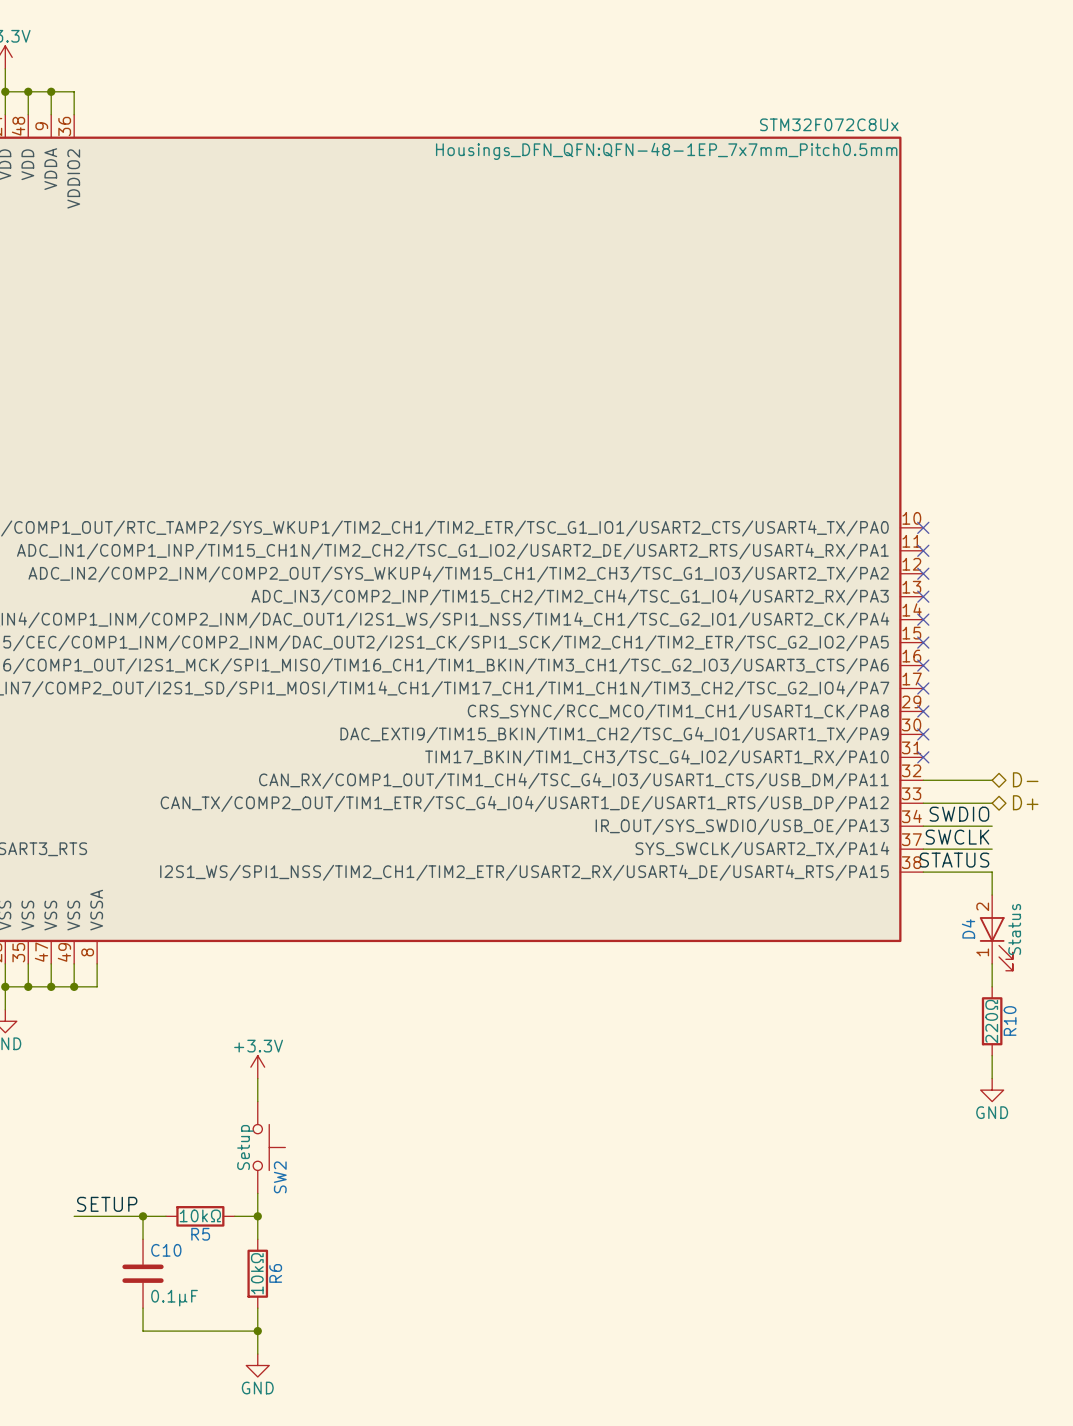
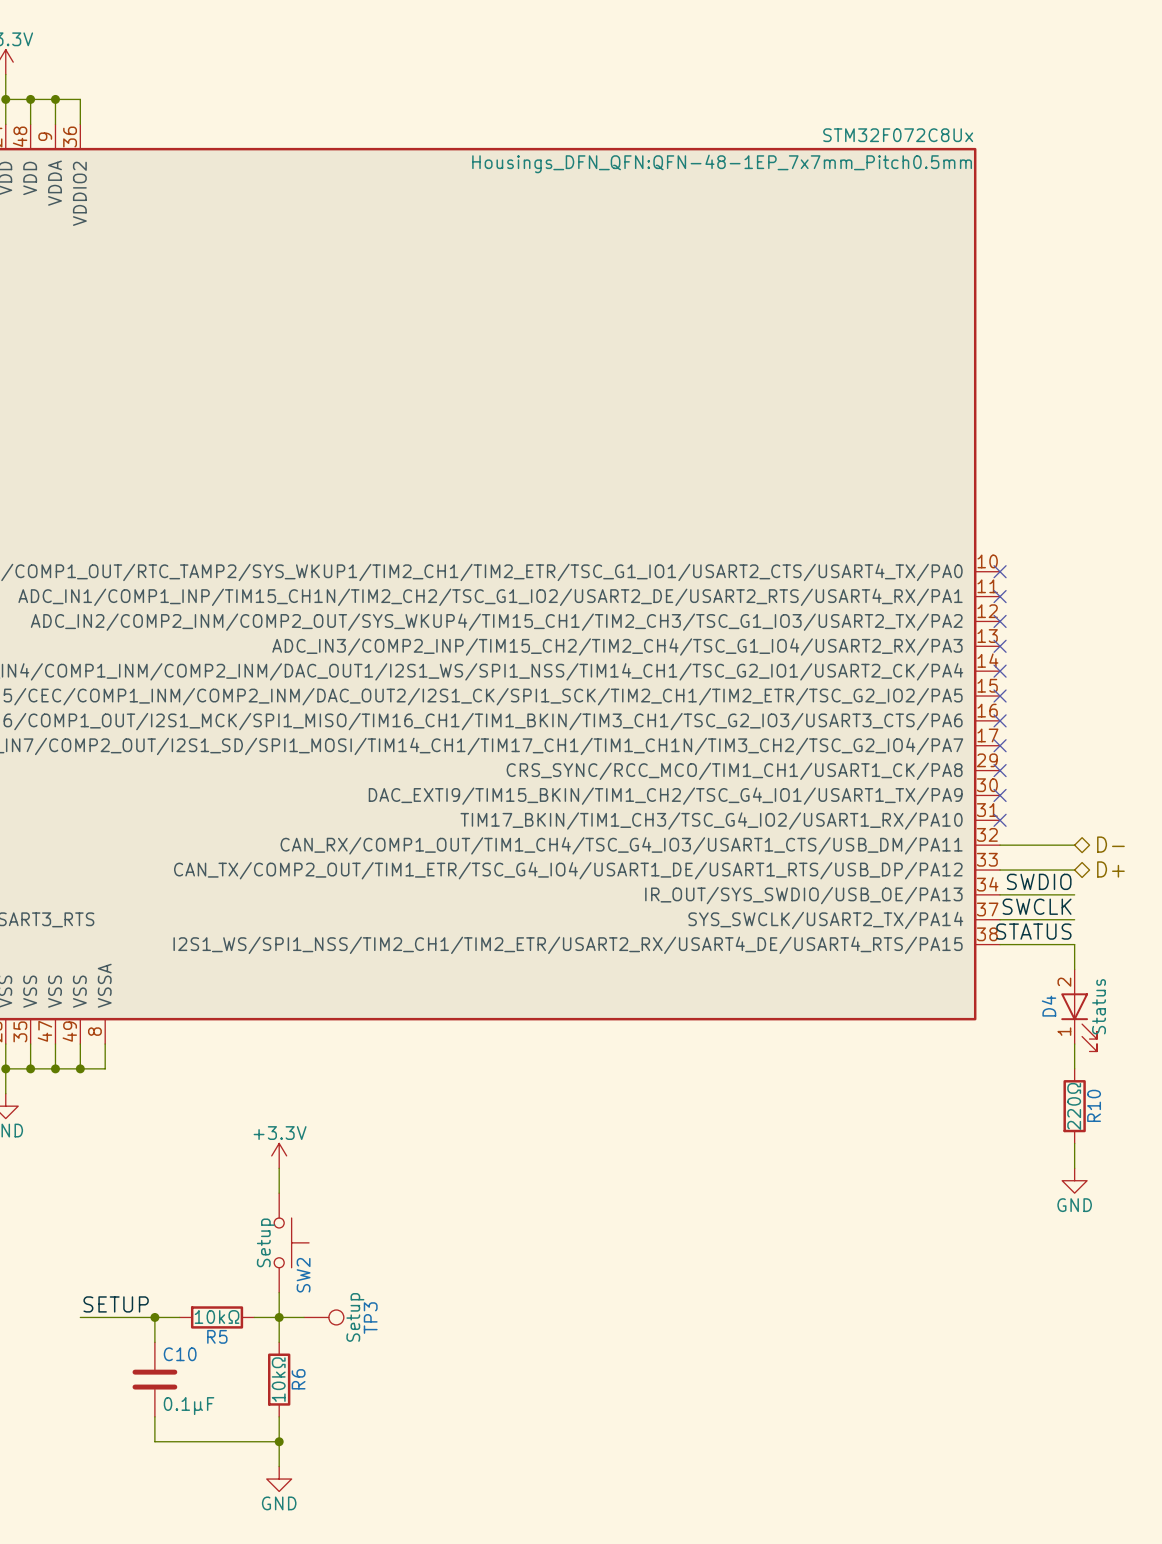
wire: none -> (279, 1317) (304, 1317)
TP3: none -> Setup (323, 1317)

